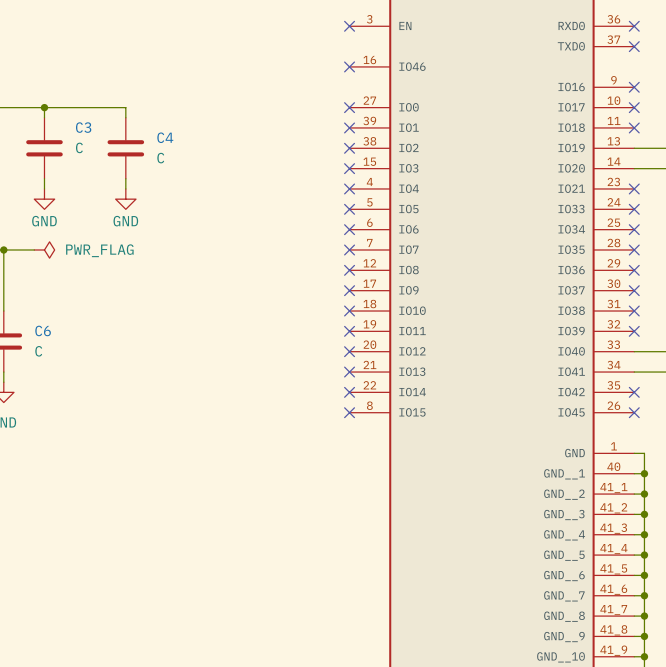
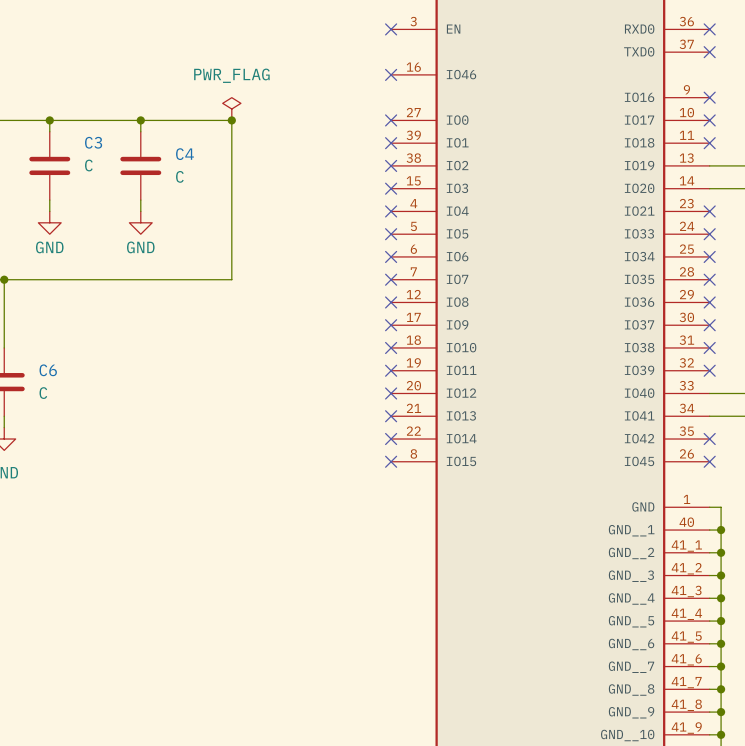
power symbol: none -> PWR_FLAG (231, 109)
wire: none -> (140, 120) (231, 120) (231, 279) (38, 279)
junction: none -> (140, 120)
junction: none -> (231, 120)
power symbol: PWR_FLAG (44, 249) -> none

